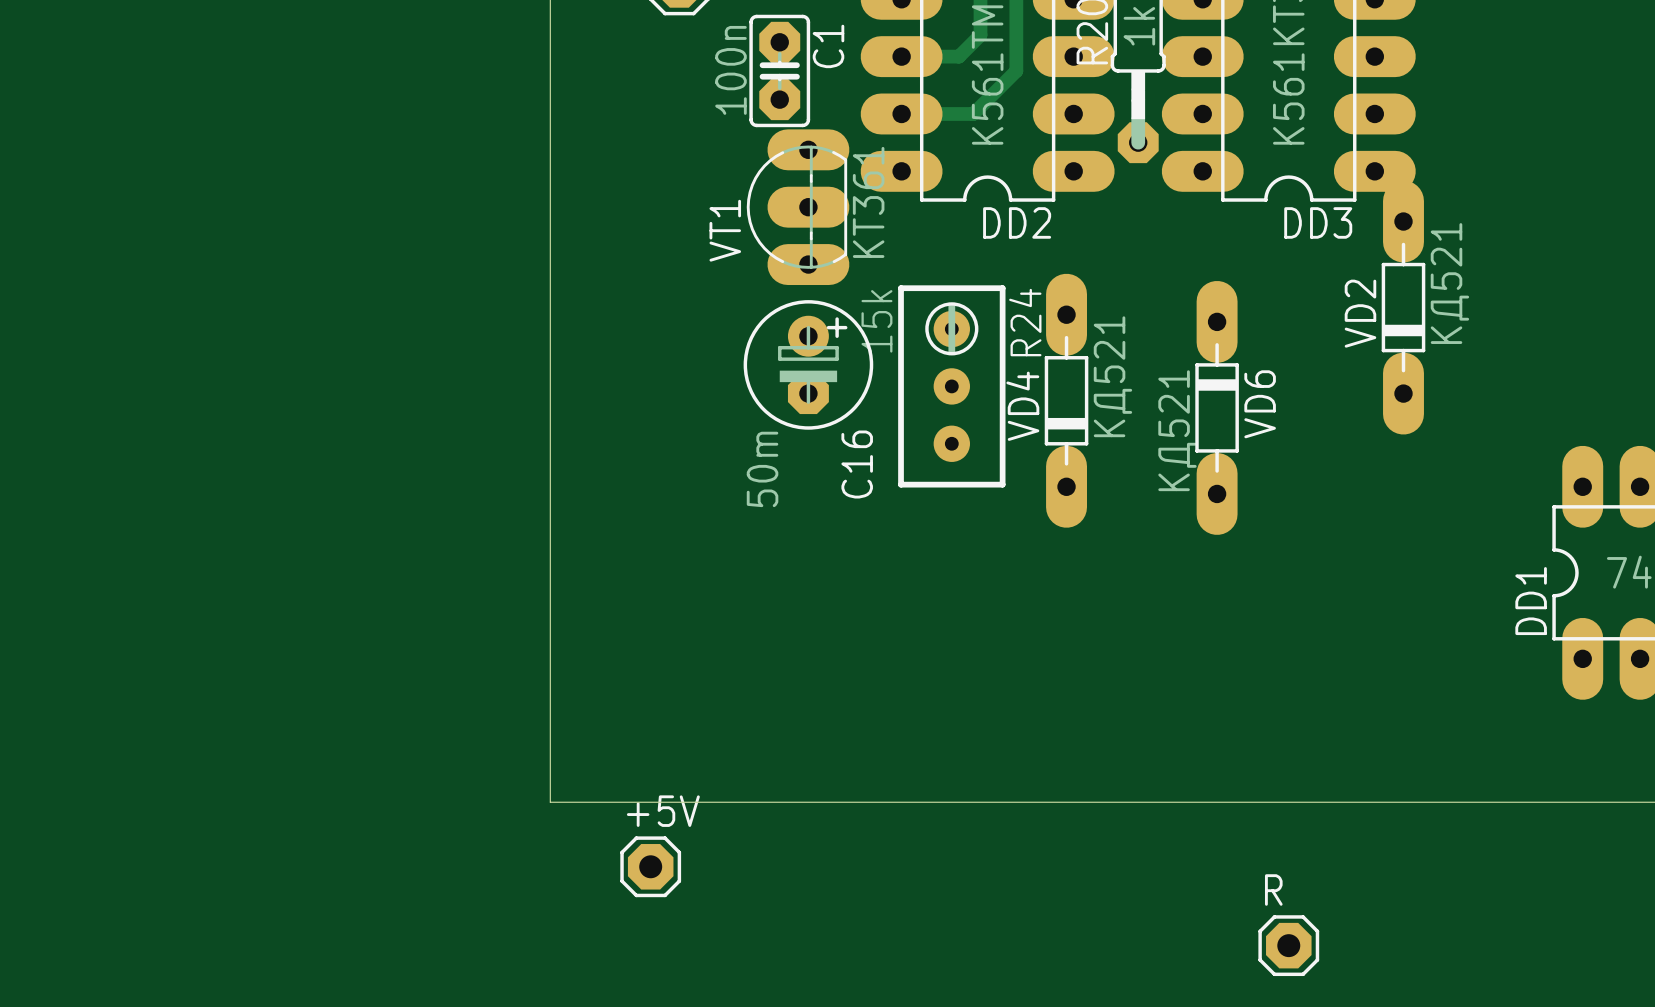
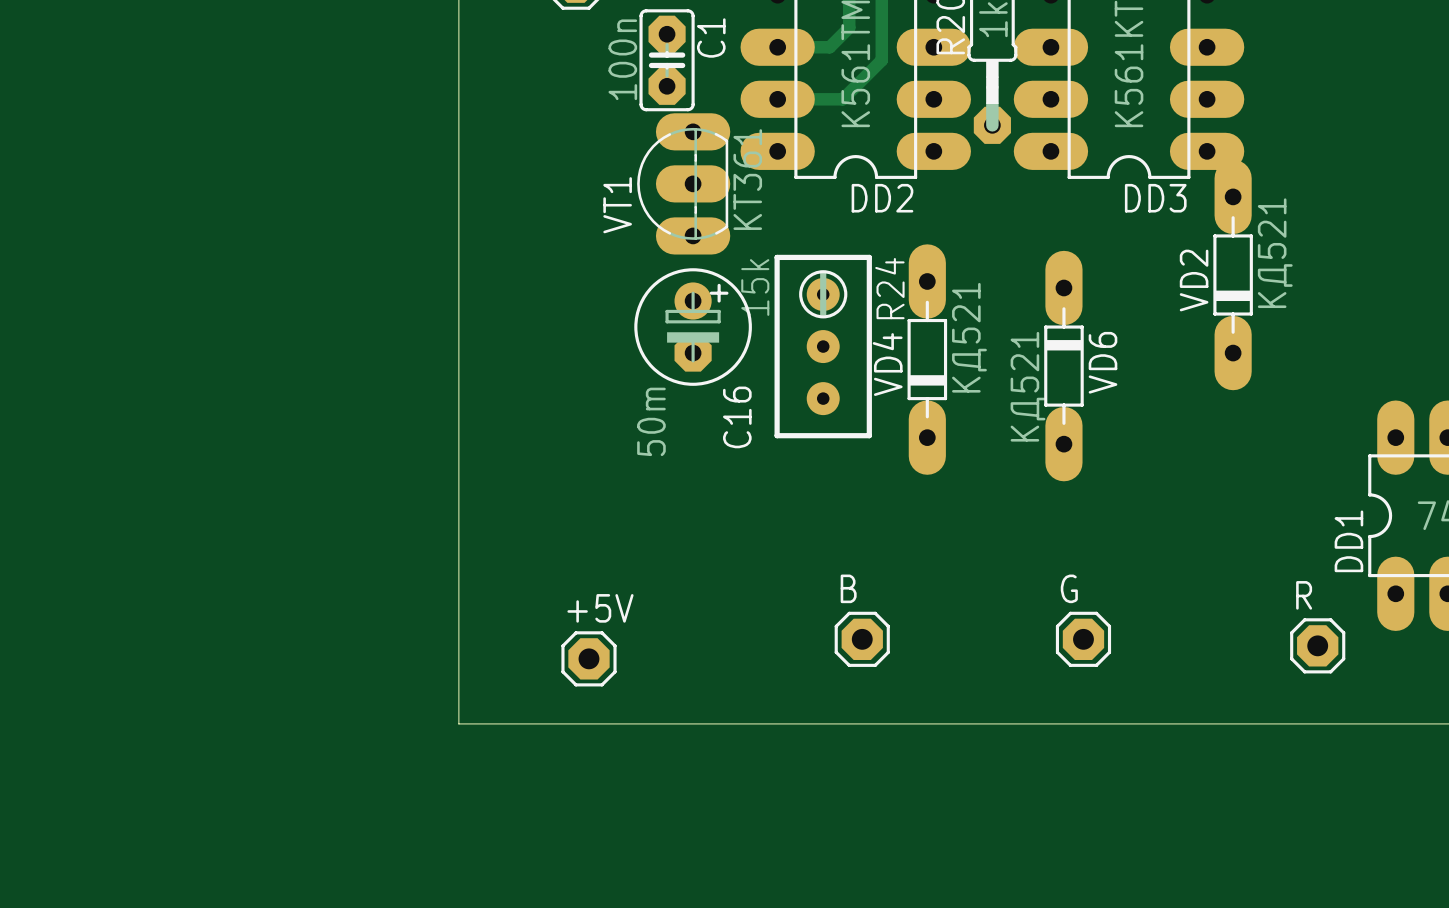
B: none -> (862, 639)
G: none -> (1083, 639)
+5V position: (650, 866) -> (588, 658)
R position: (1288, 945) -> (1317, 645)

